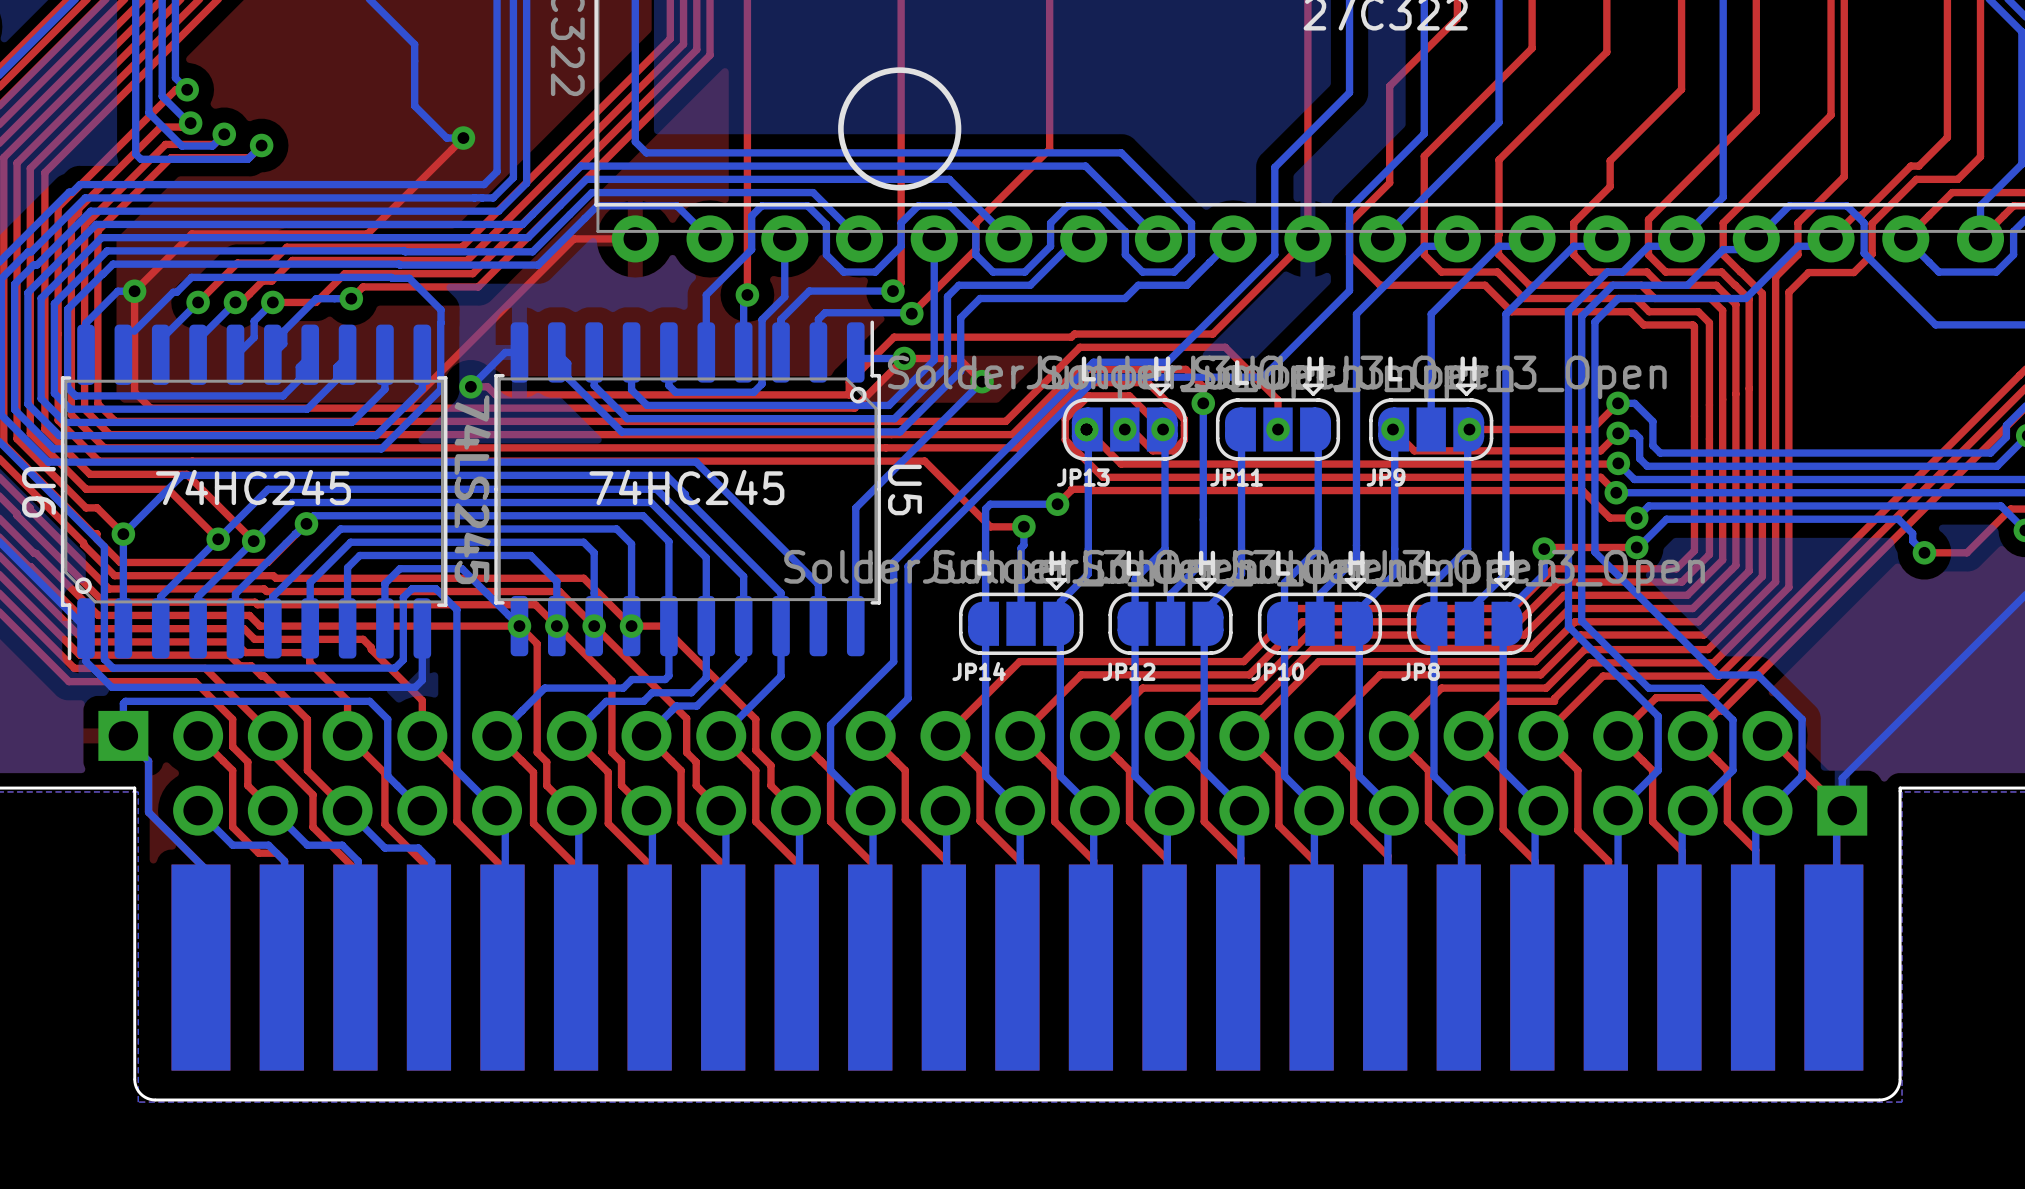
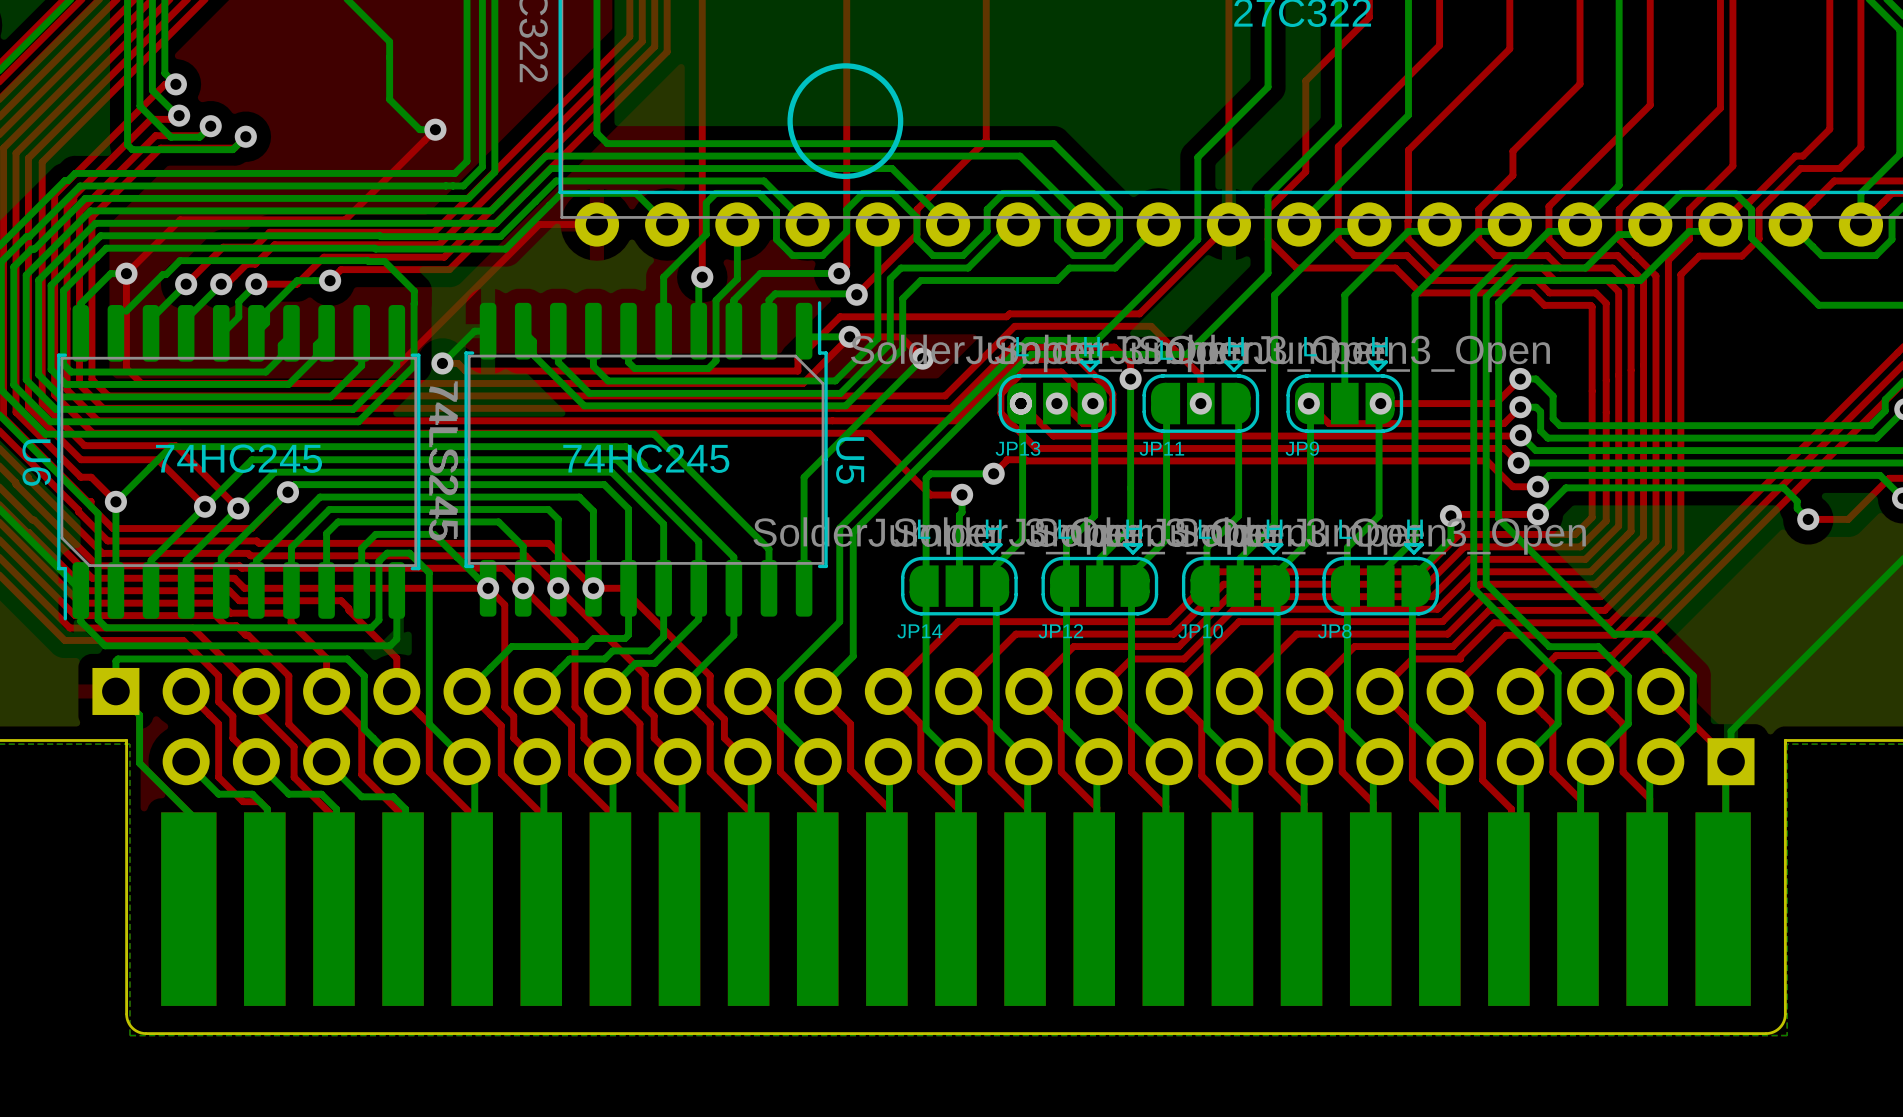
U5 footprint: [494, 320, 881, 657] -> [464, 301, 828, 617]
U6 footprint: [60, 324, 448, 661] -> [57, 305, 421, 621]

